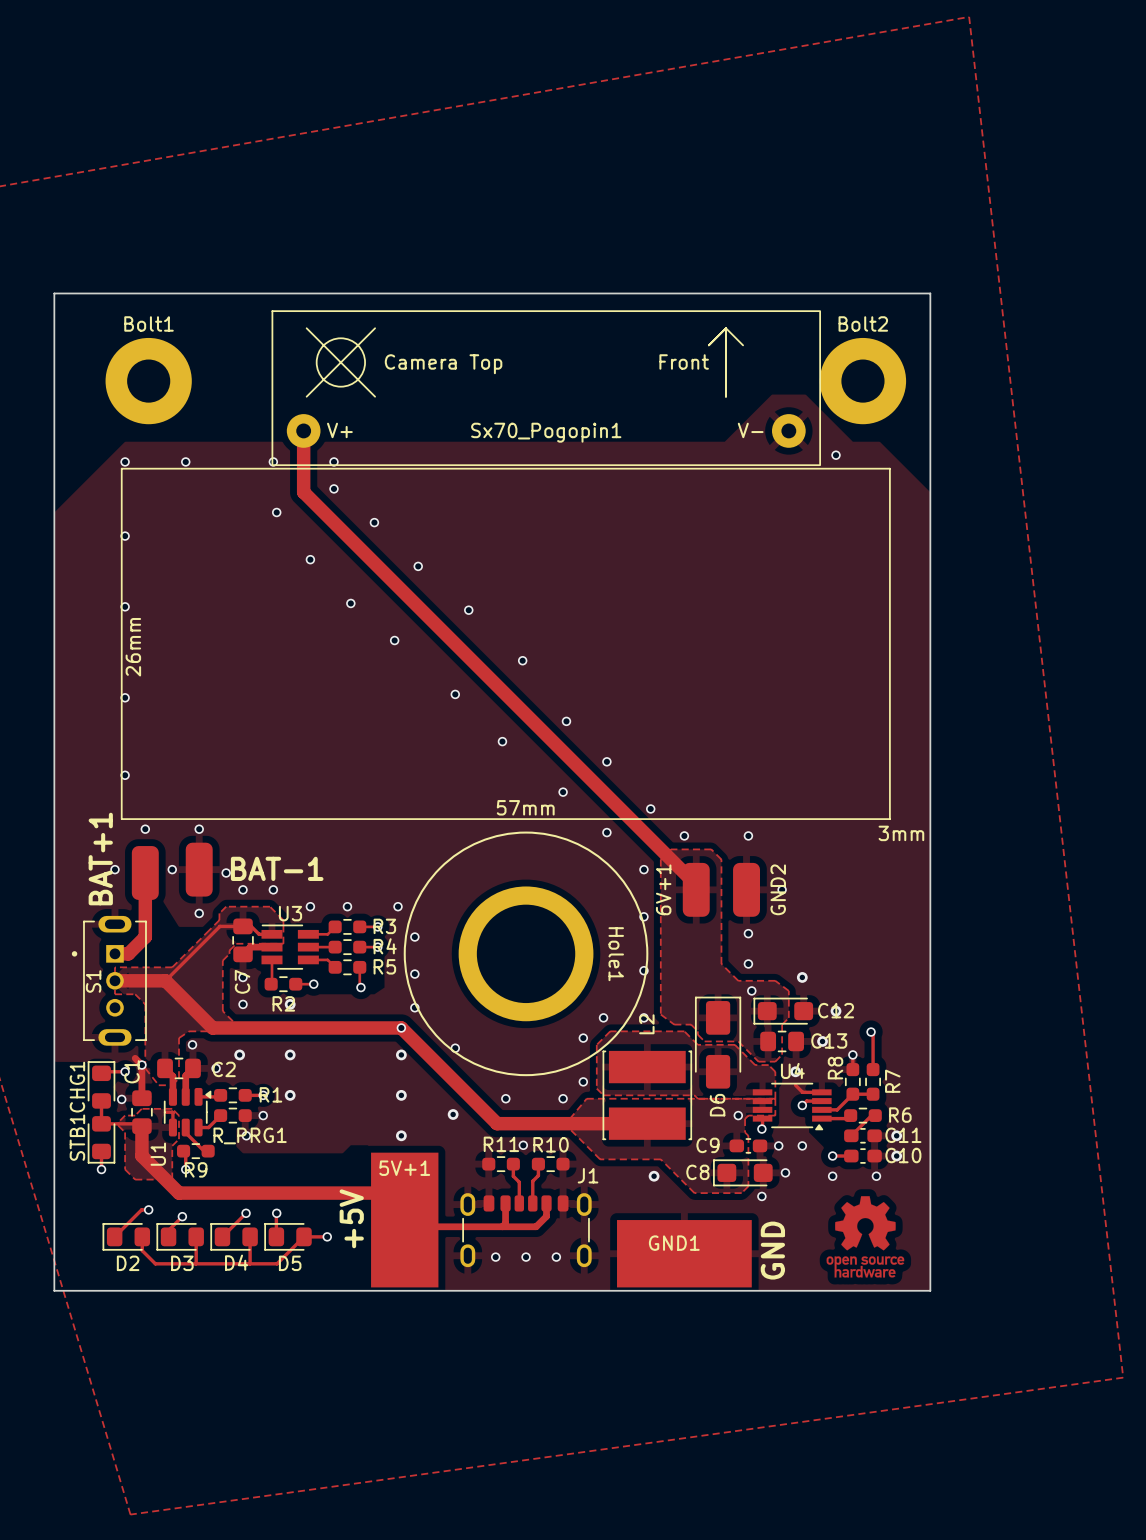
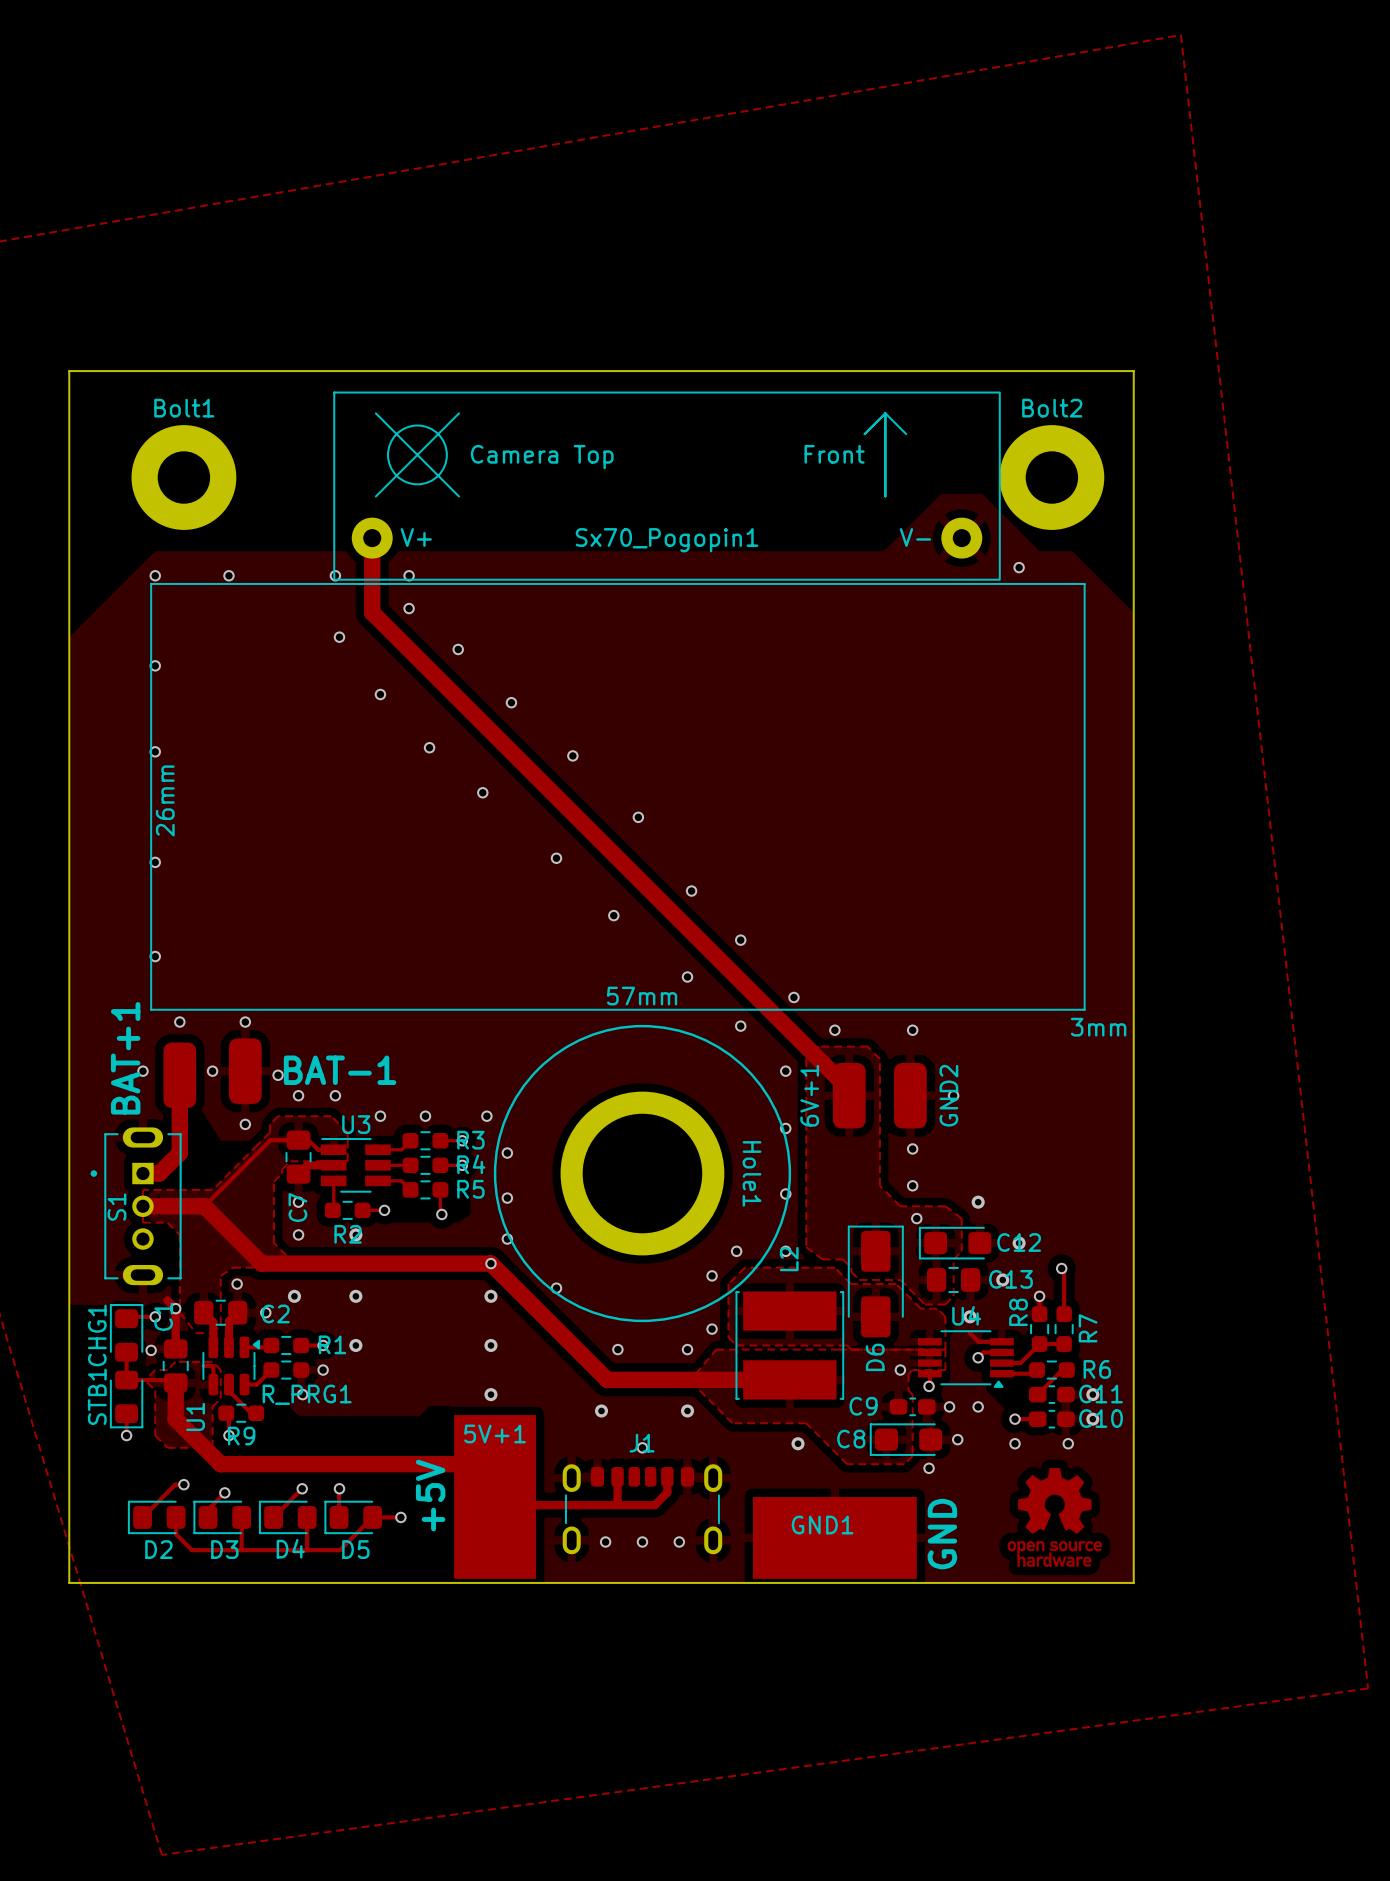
via position: (453, 1114) -> (601, 1410)
via position: (523, 1145) -> (642, 1447)
via: none -> (687, 1410)
R11: (501, 1164) -> none
track: (513, 1164) (513, 1176) (519, 1182) (519, 1203) -> none
track: (538, 1164) (538, 1175) (532, 1181) (532, 1203) -> none
R10: (550, 1164) -> none
J1 name position: J1 (588, 1175) -> J1 (642, 1443)

